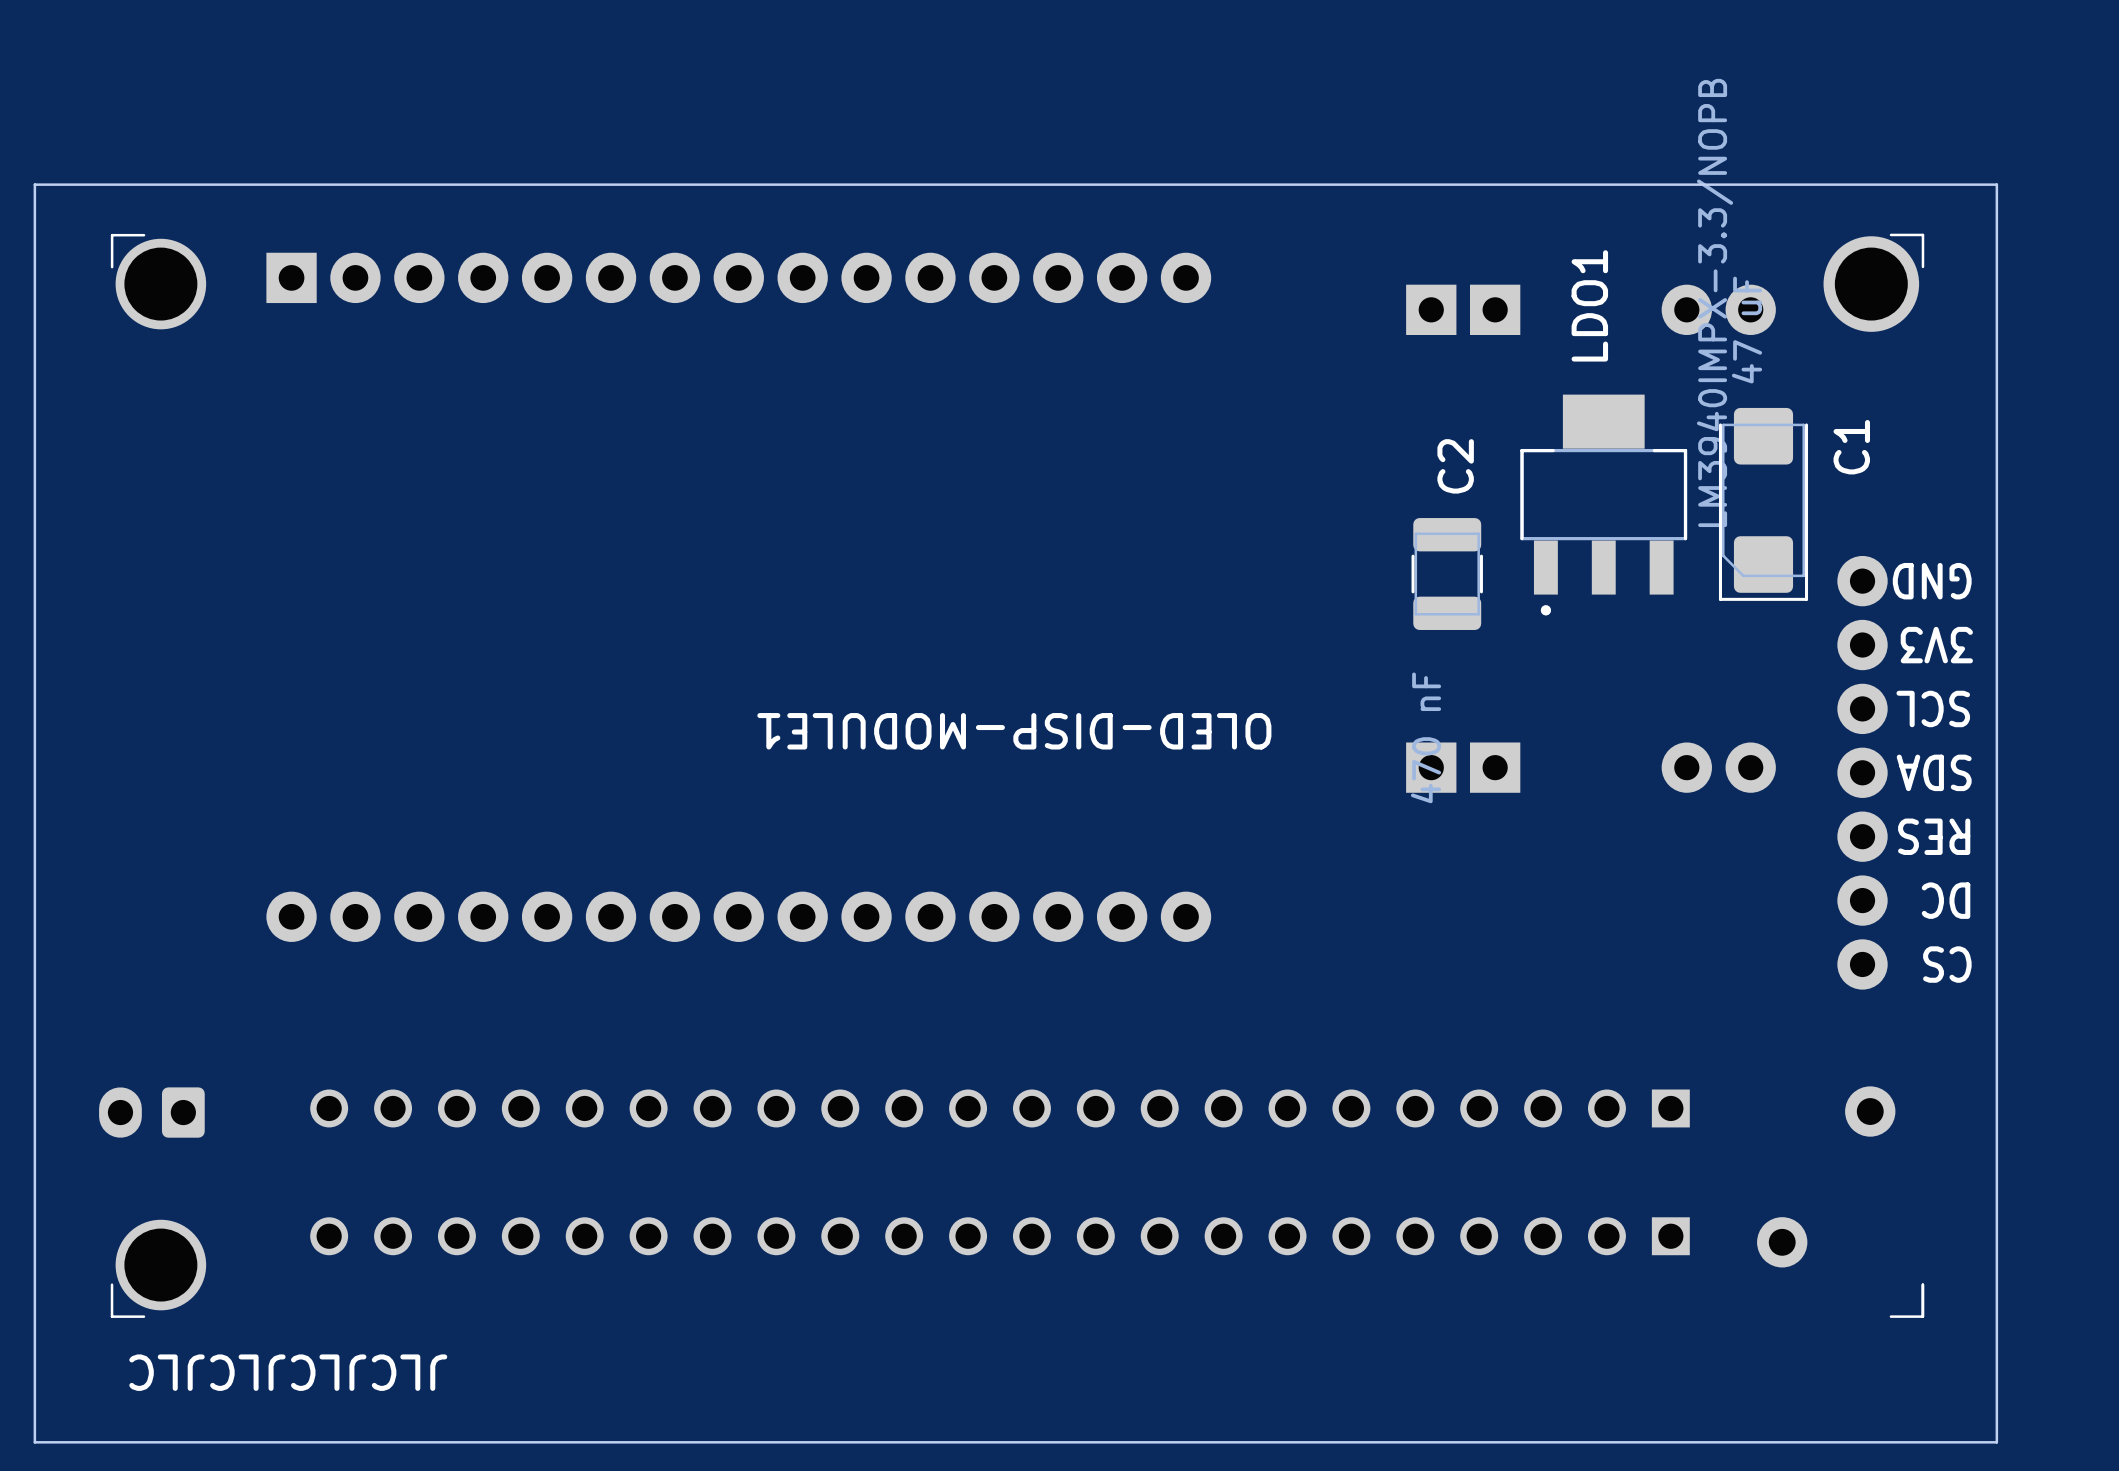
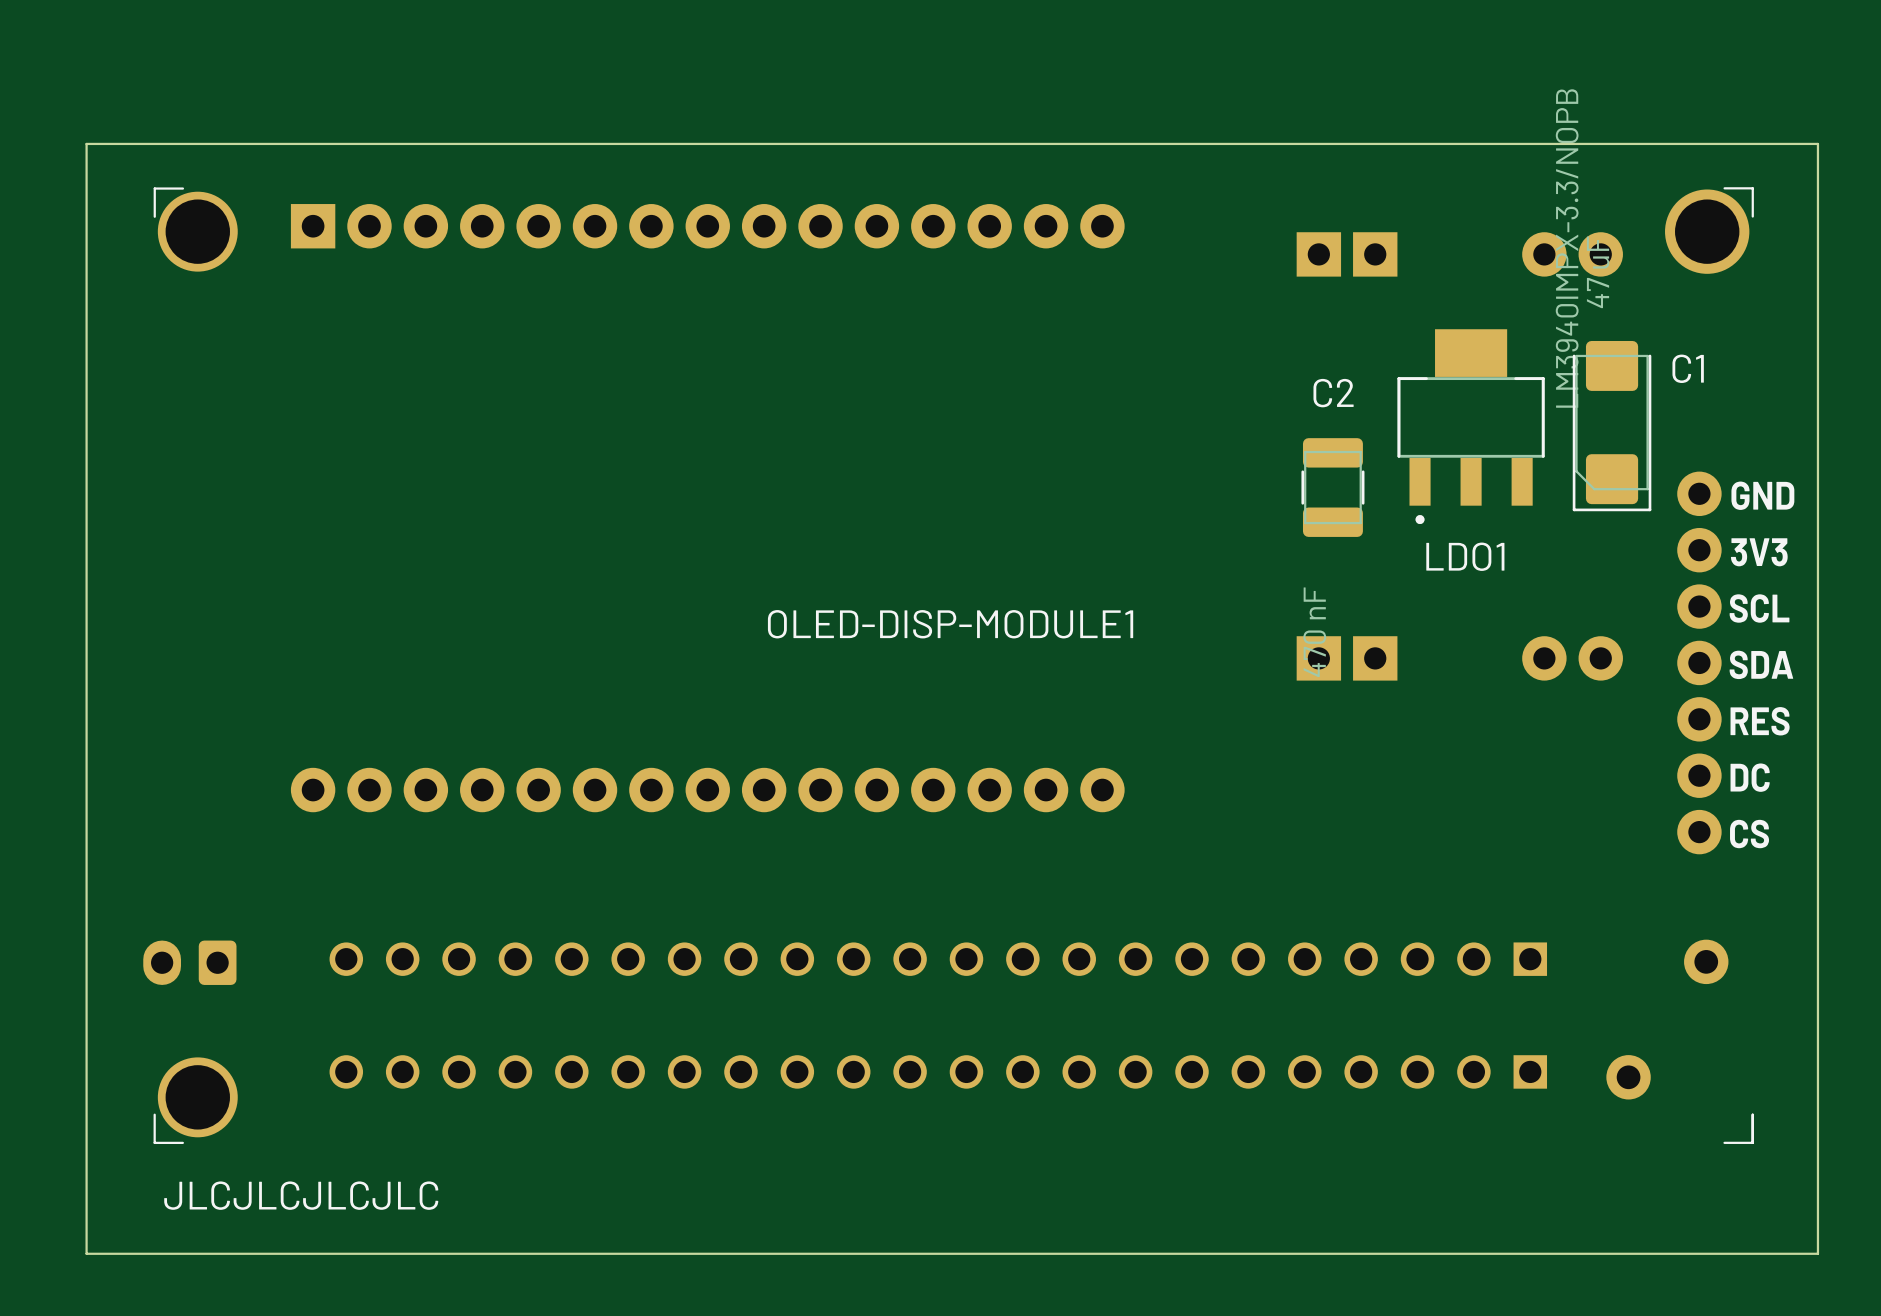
LDO1 name rotation: 0° (1589, 305) -> 90° clockwise (1465, 556)
LDO1 name position: LDO1 (1589, 305) -> LDO1 (1465, 556)
C1 name rotation: 0° (1851, 447) -> 90° clockwise (1688, 368)
C2 name rotation: 0° (1455, 466) -> 90° clockwise (1333, 393)
OLED-DISP-MODULE1 text rotation: 0° (1932, 581) -> 180° (1762, 495)
OLED-DISP-MODULE1 text rotation: 0° (1936, 645) -> 180° (1759, 552)
OLED-DISP-MODULE1 text rotation: 0° (1933, 708) -> 180° (1759, 608)
OLED-DISP-MODULE1 name rotation: 0° (1014, 731) -> 180° (950, 624)
OLED-DISP-MODULE1 text rotation: 0° (1934, 772) -> 180° (1761, 664)
OLED-DISP-MODULE1 text rotation: 0° (1934, 836) -> 180° (1760, 721)
OLED-DISP-MODULE1 text rotation: 0° (1946, 900) -> 180° (1750, 777)
OLED-DISP-MODULE1 text rotation: 0° (1947, 964) -> 180° (1749, 834)
text rotation: 0° (288, 1372) -> 180° (301, 1195)

